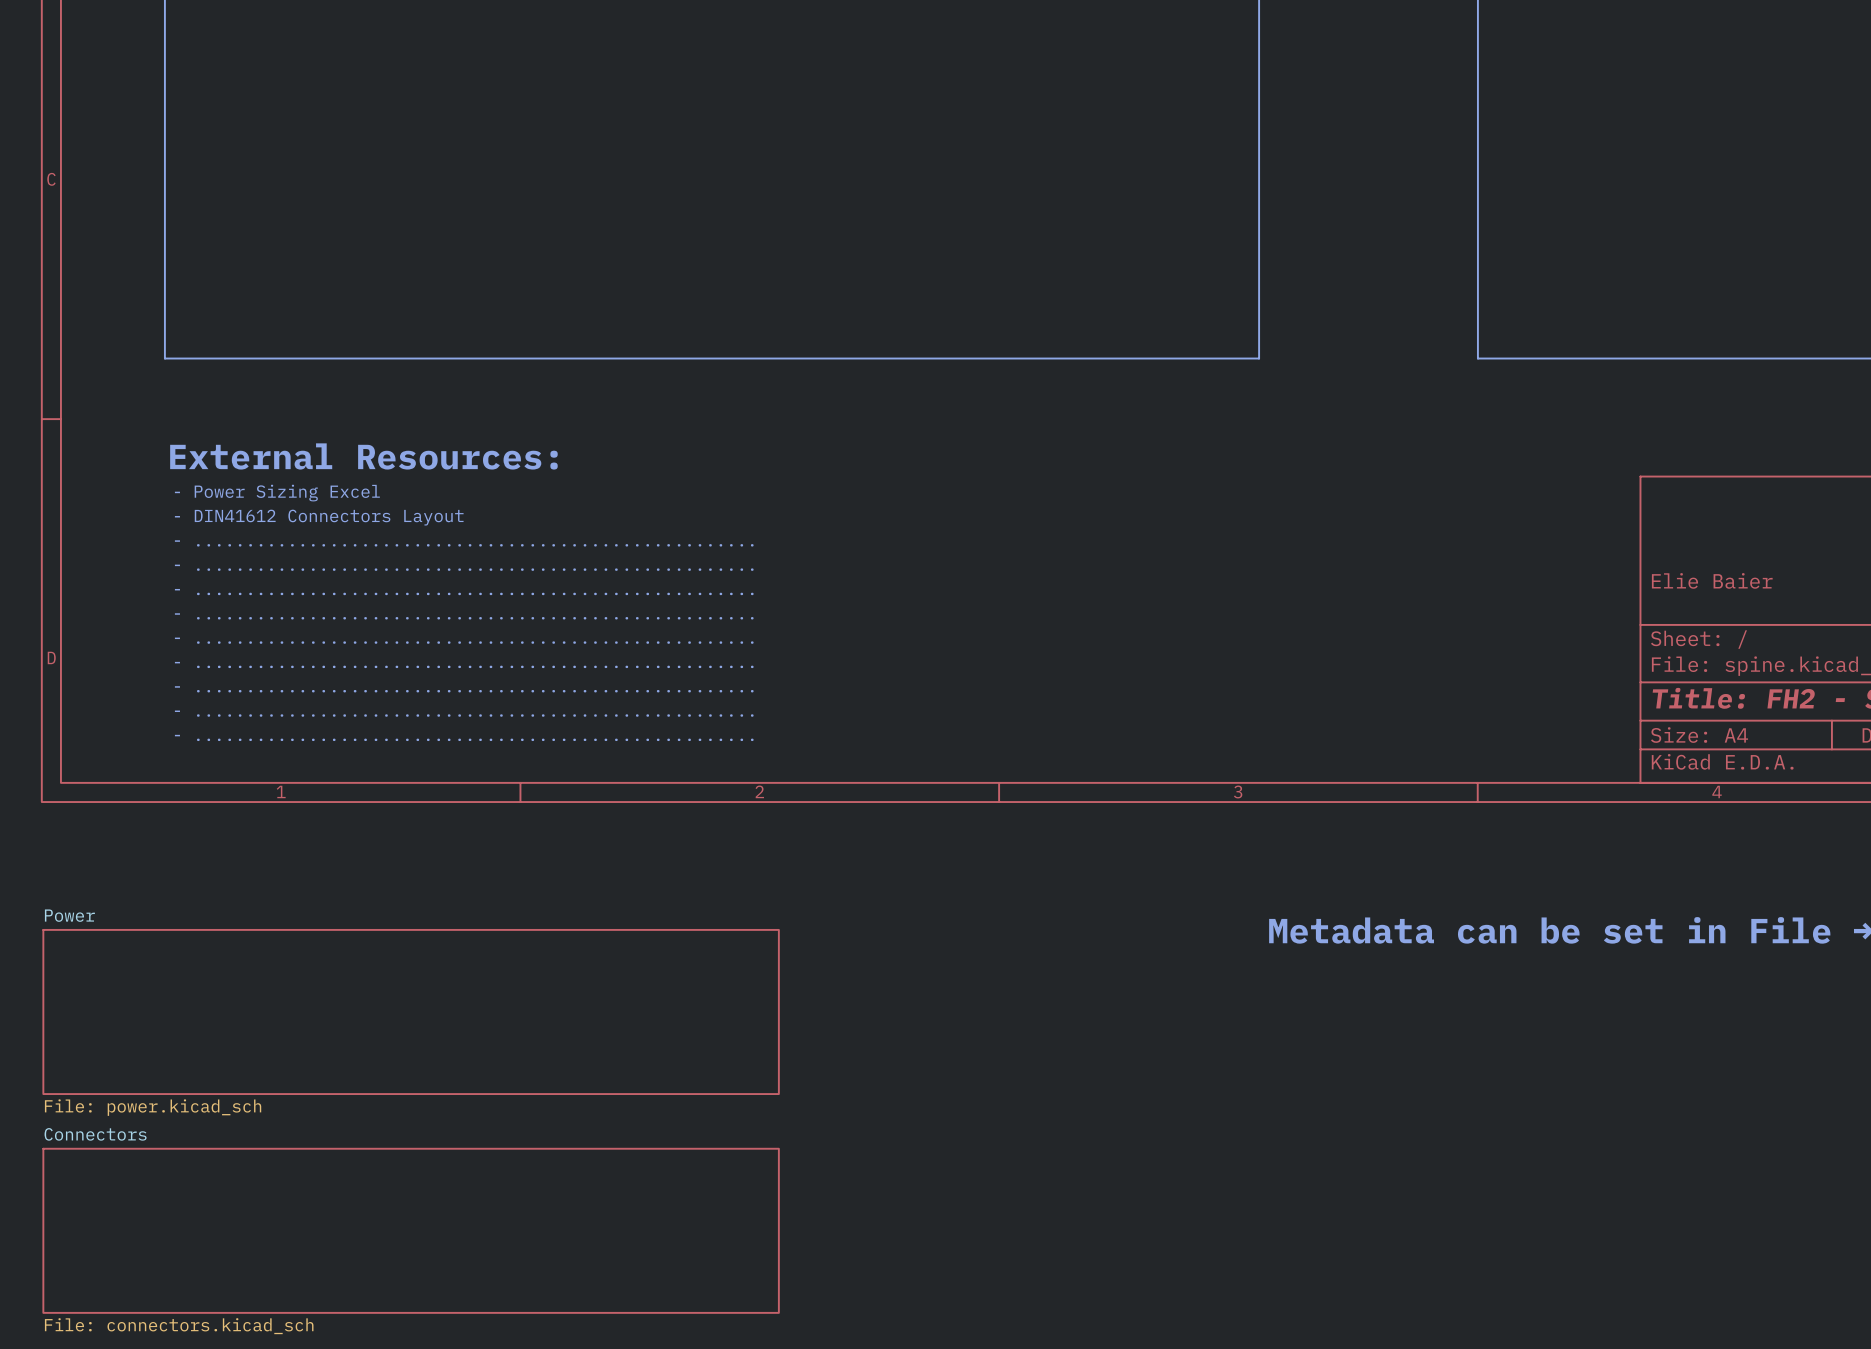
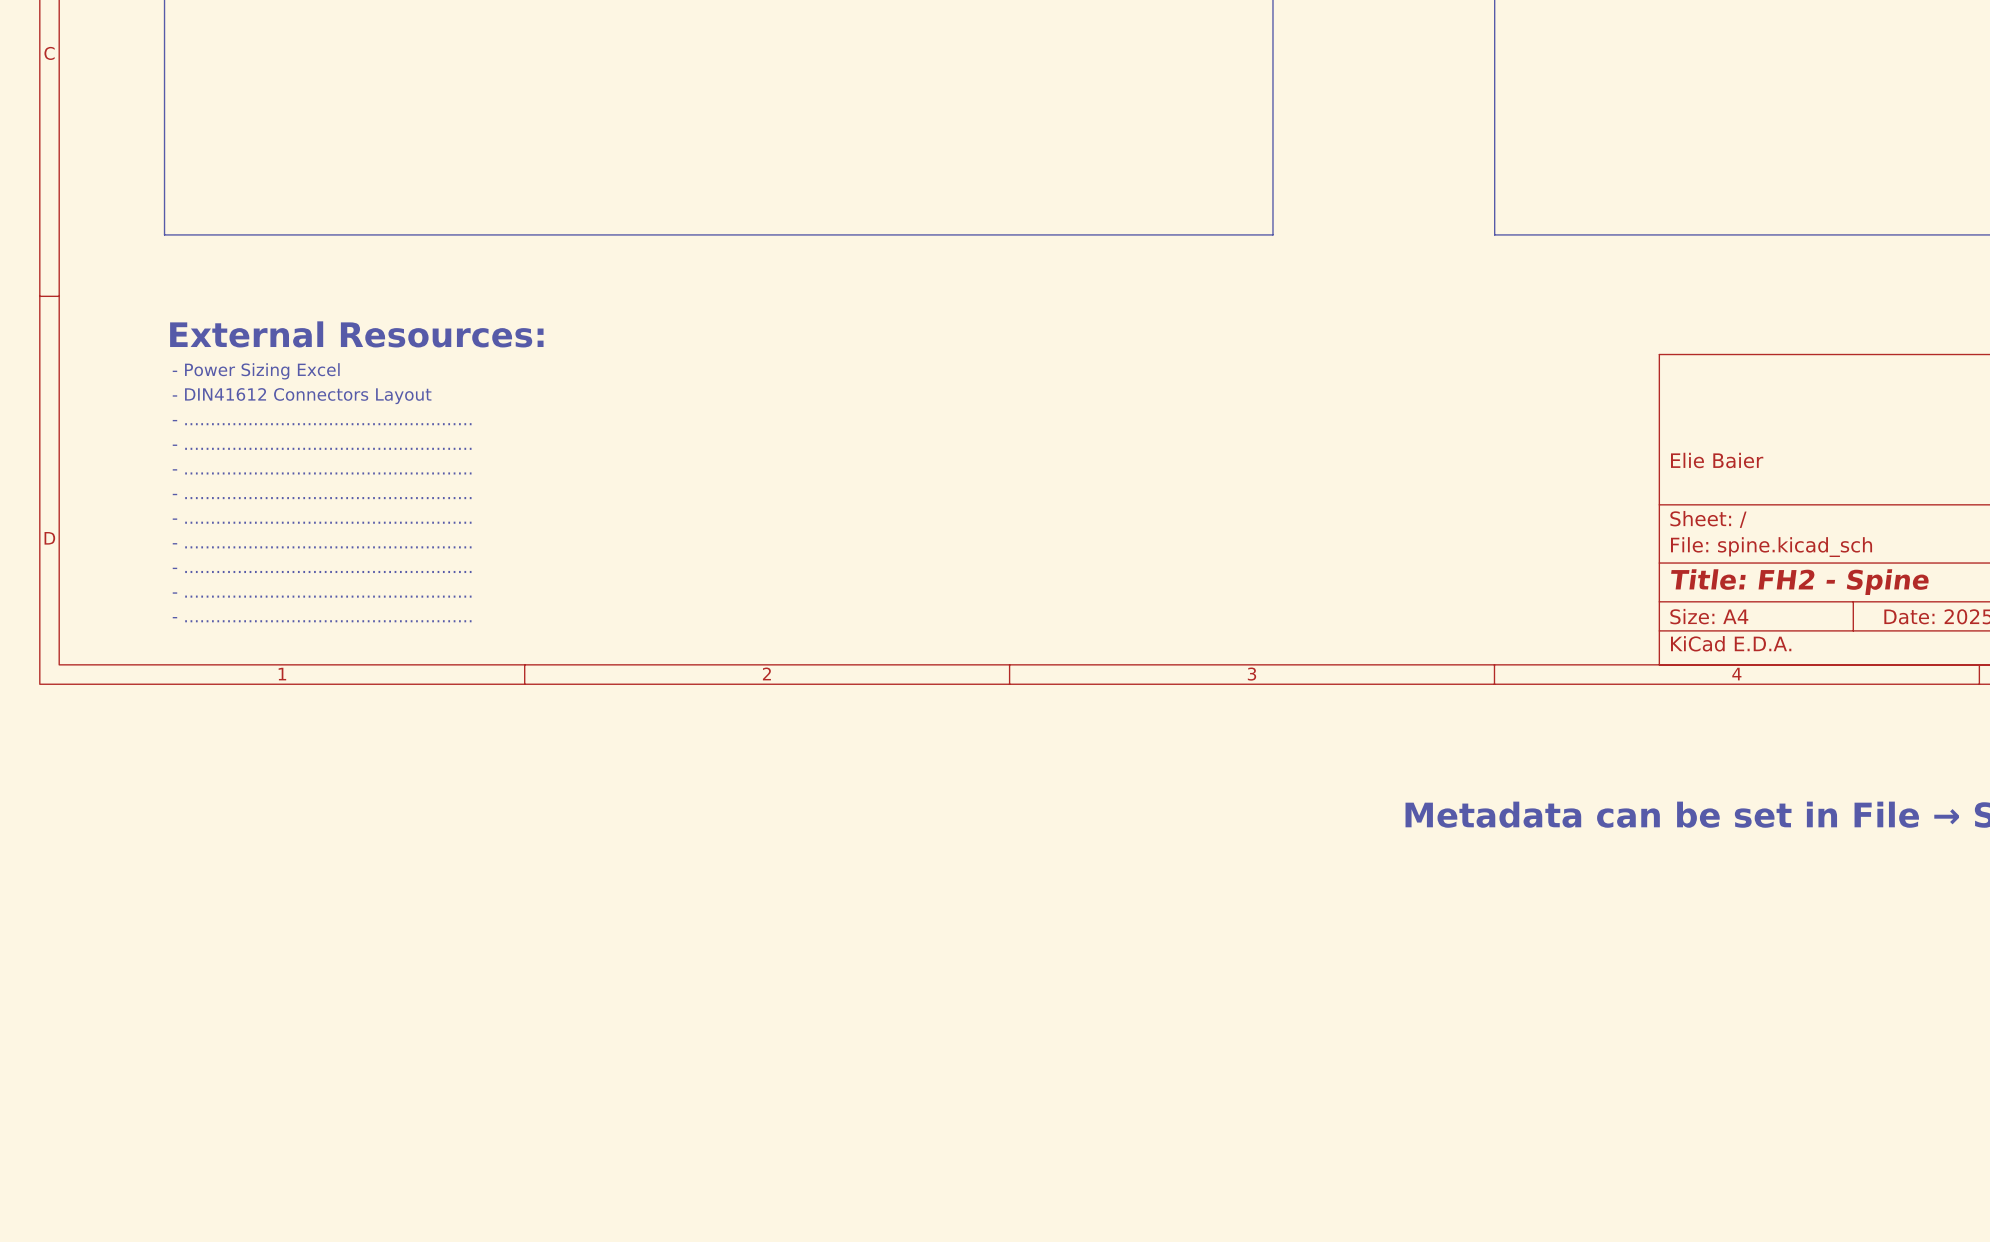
sheet Power: File: power.kicad_sch (411, 1011) -> none
sheet Connectors: File: connectors.kicad_sch (411, 1230) -> none

